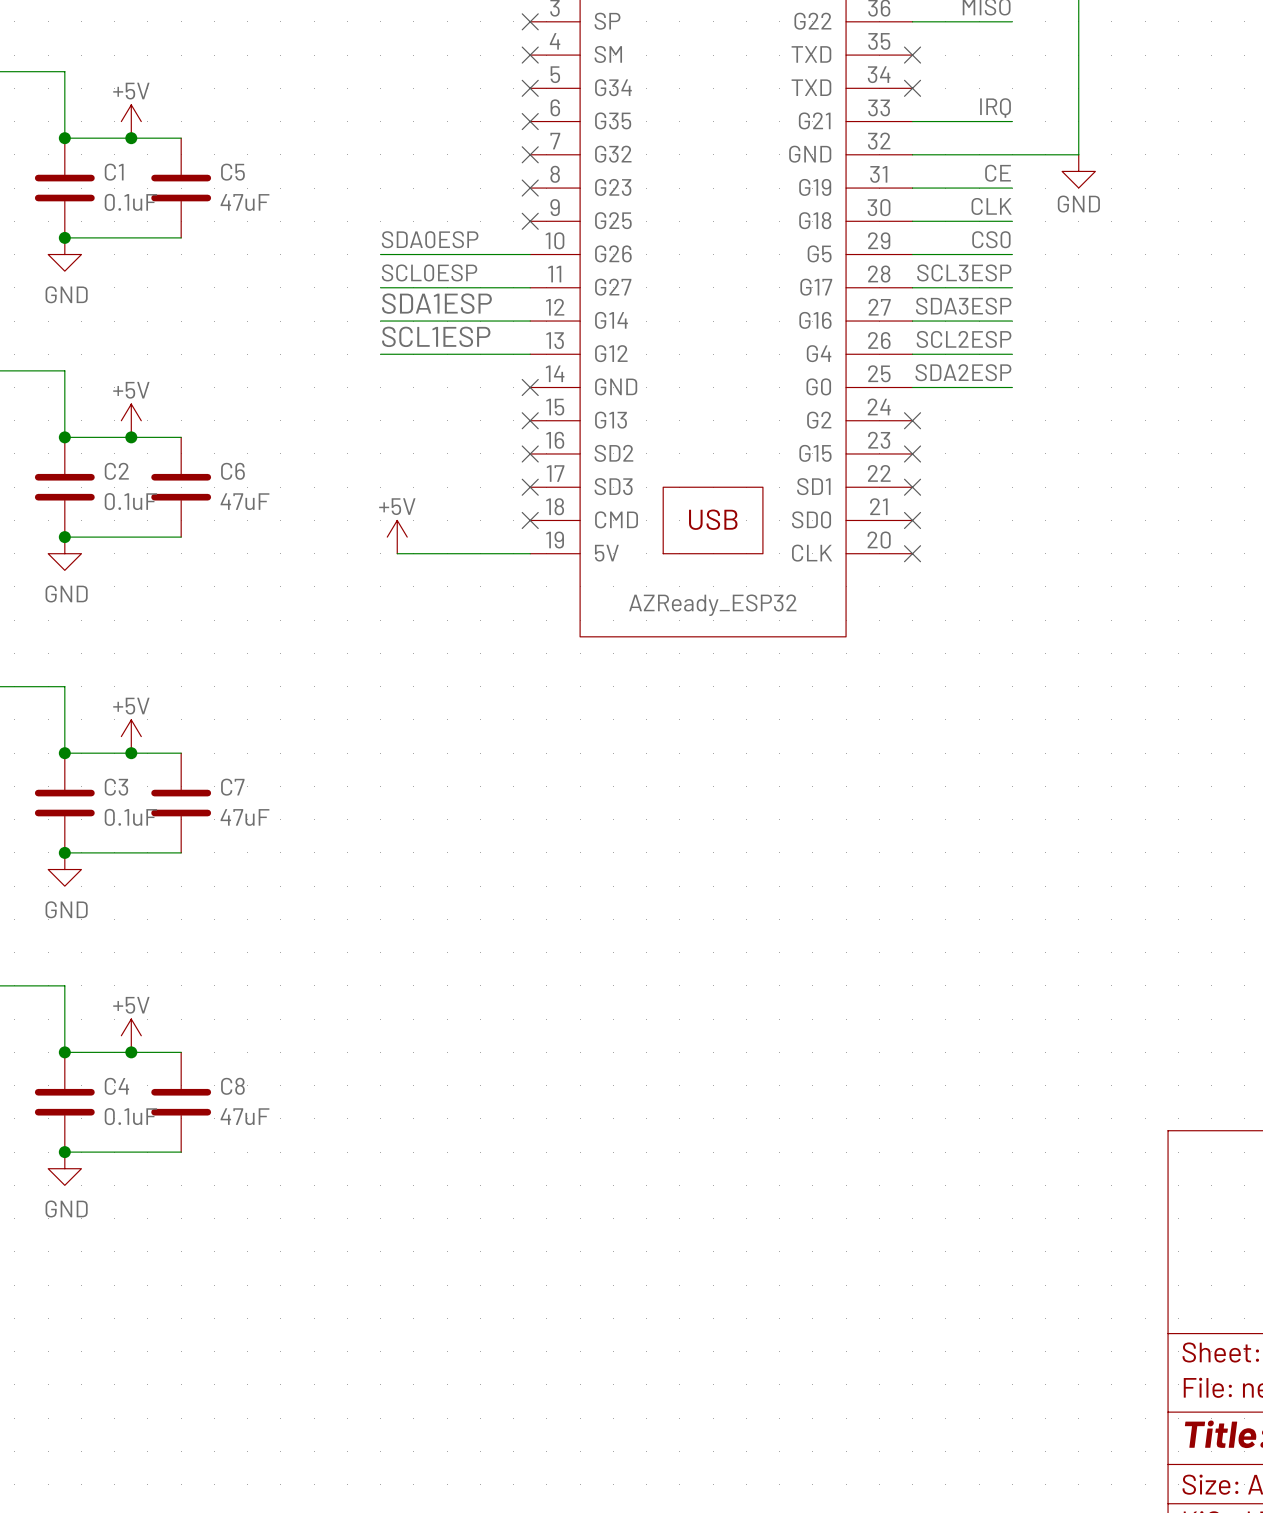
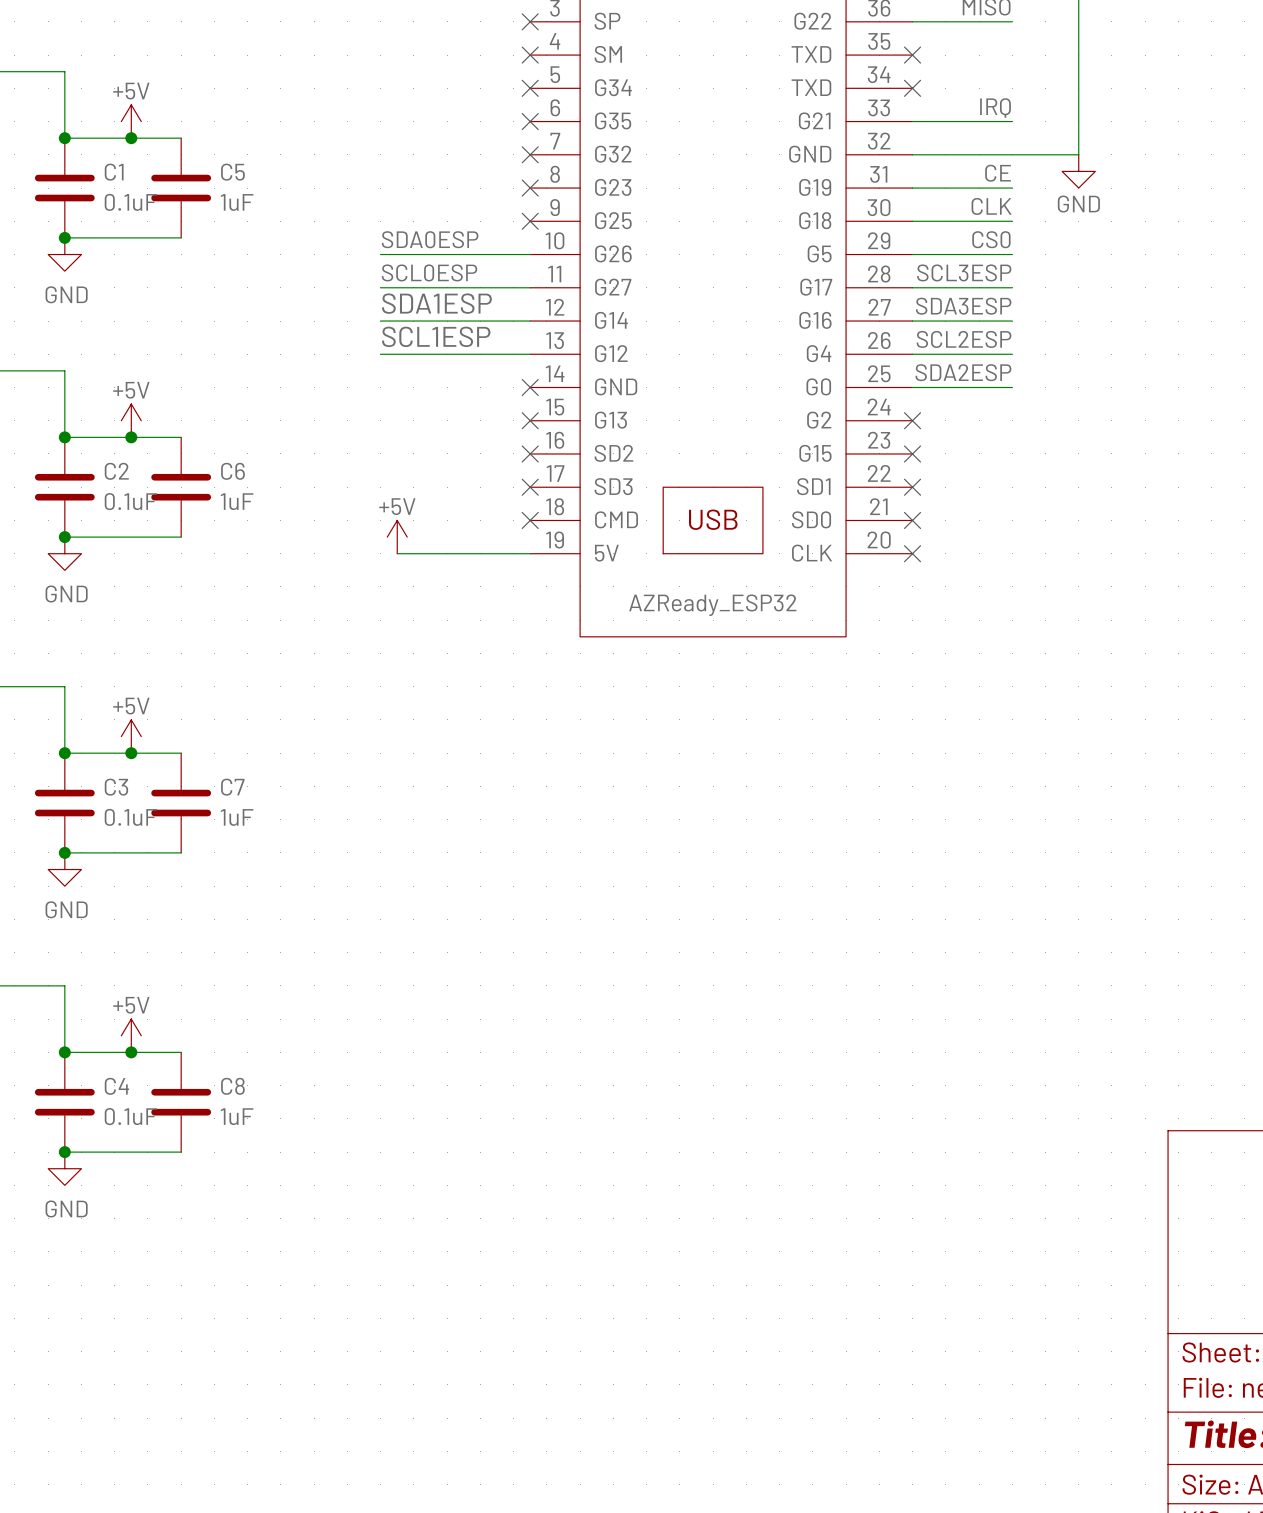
C5 value: 47uF (244, 202) -> 1uF (237, 202)
C6 value: 47uF (244, 501) -> 1uF (237, 501)
C7 value: 47uF (244, 817) -> 1uF (237, 817)
C8 value: 47uF (244, 1116) -> 1uF (237, 1116)

